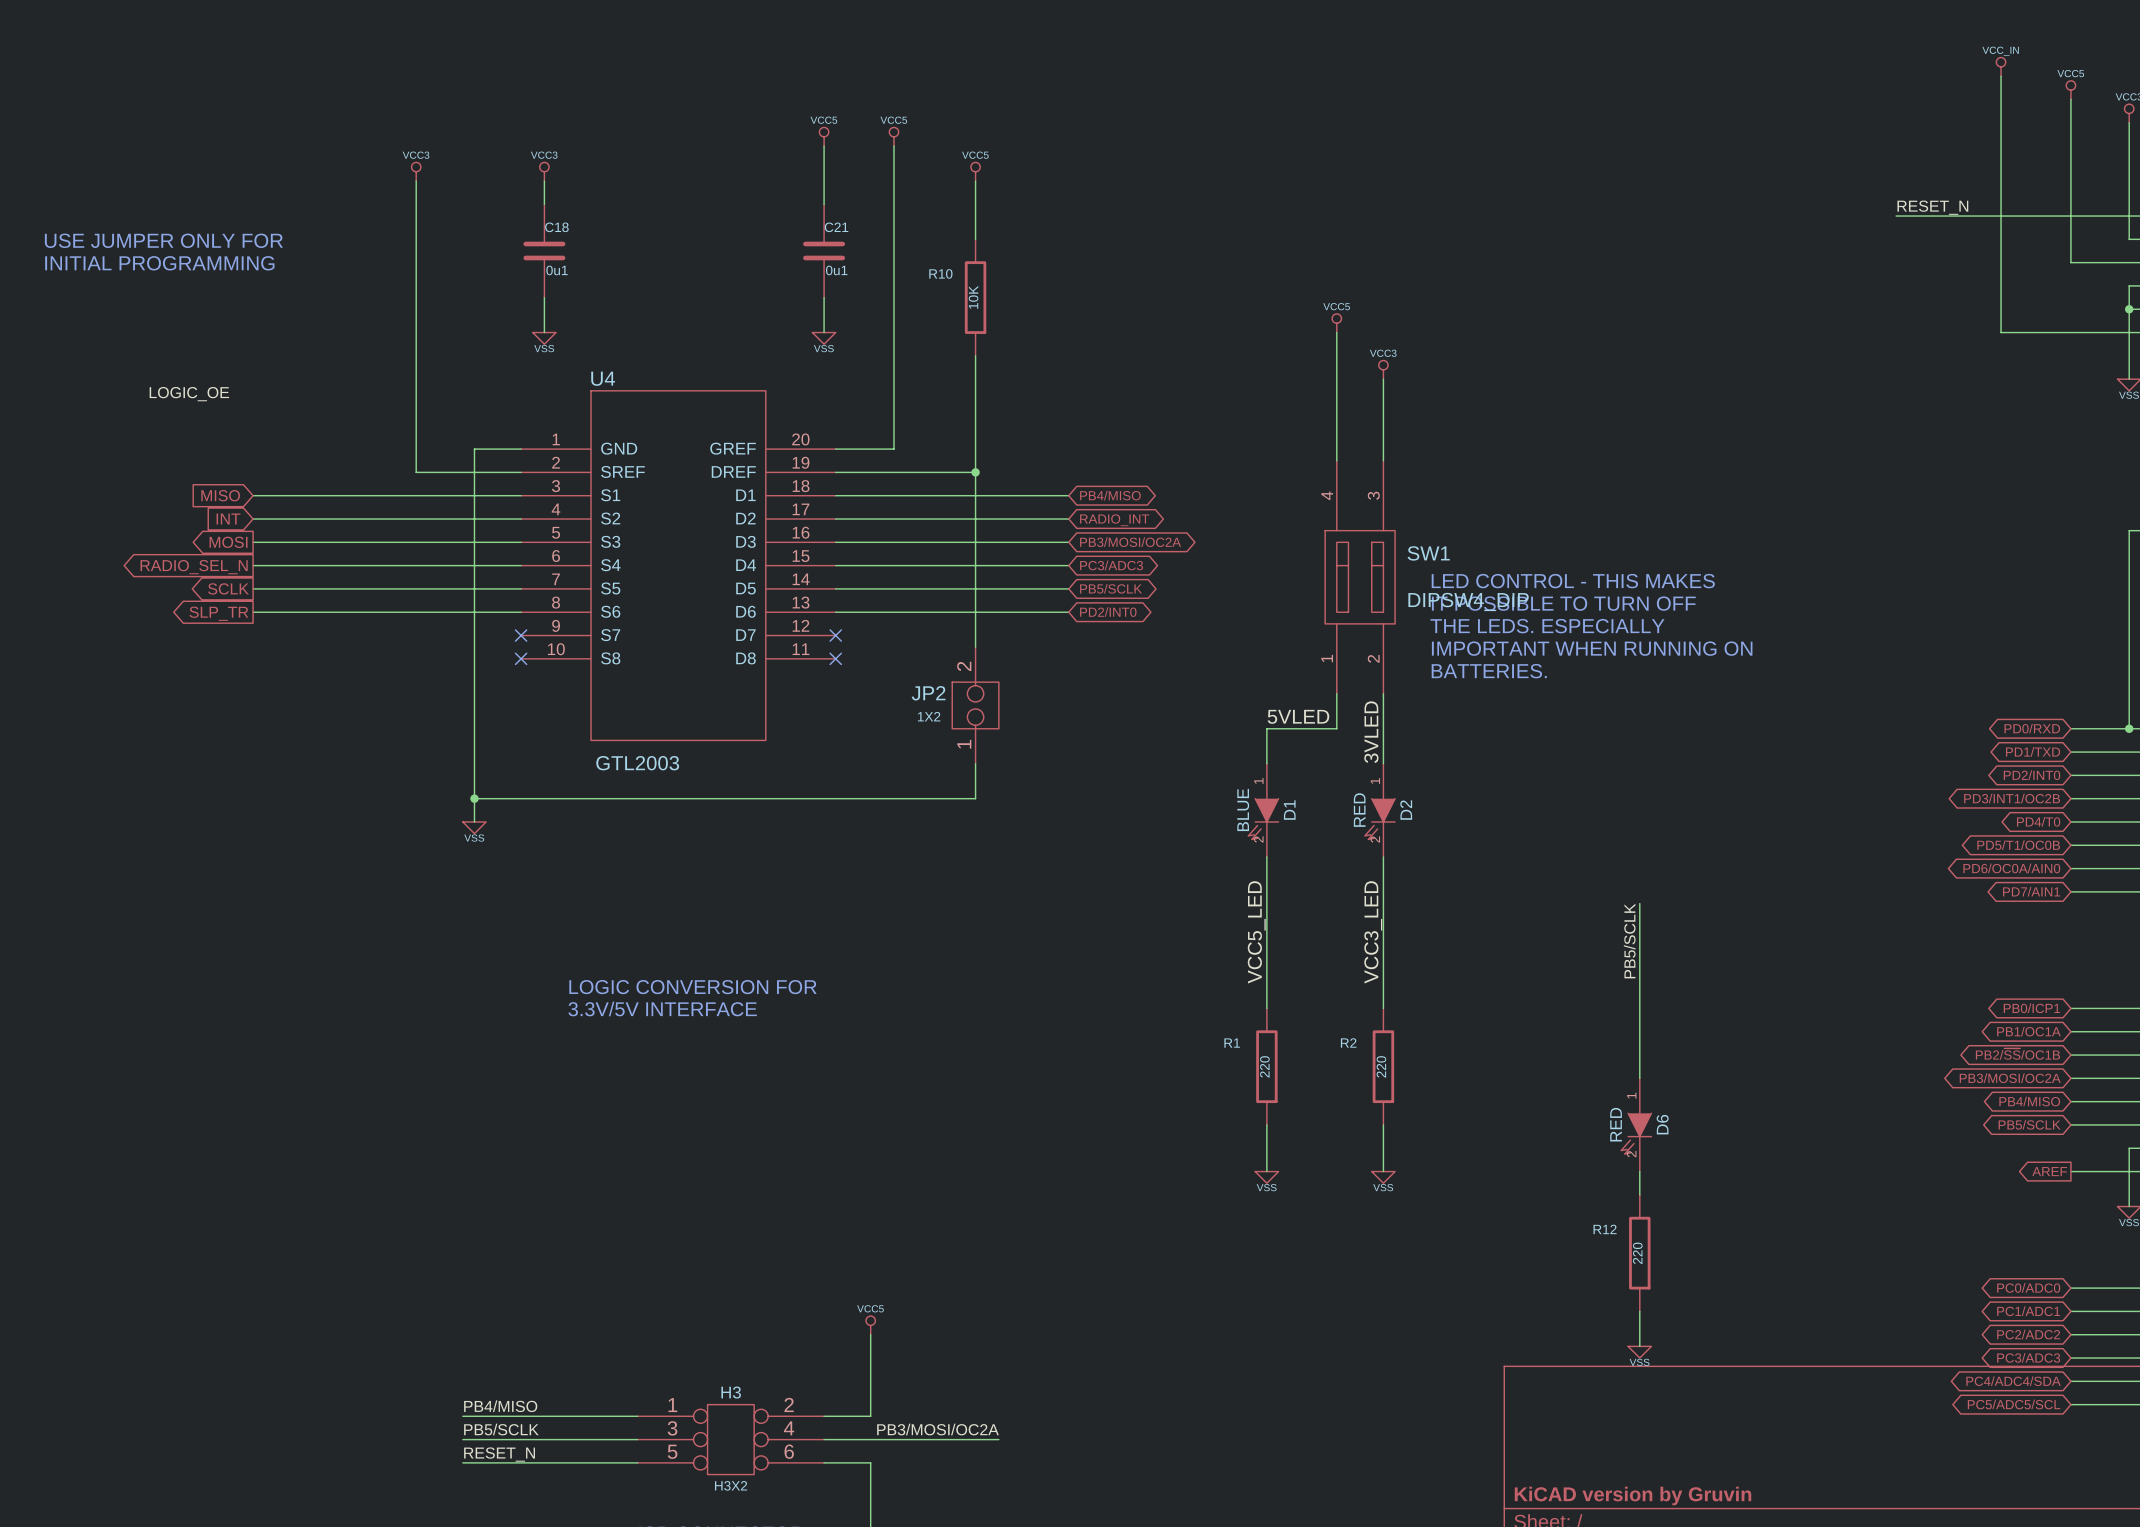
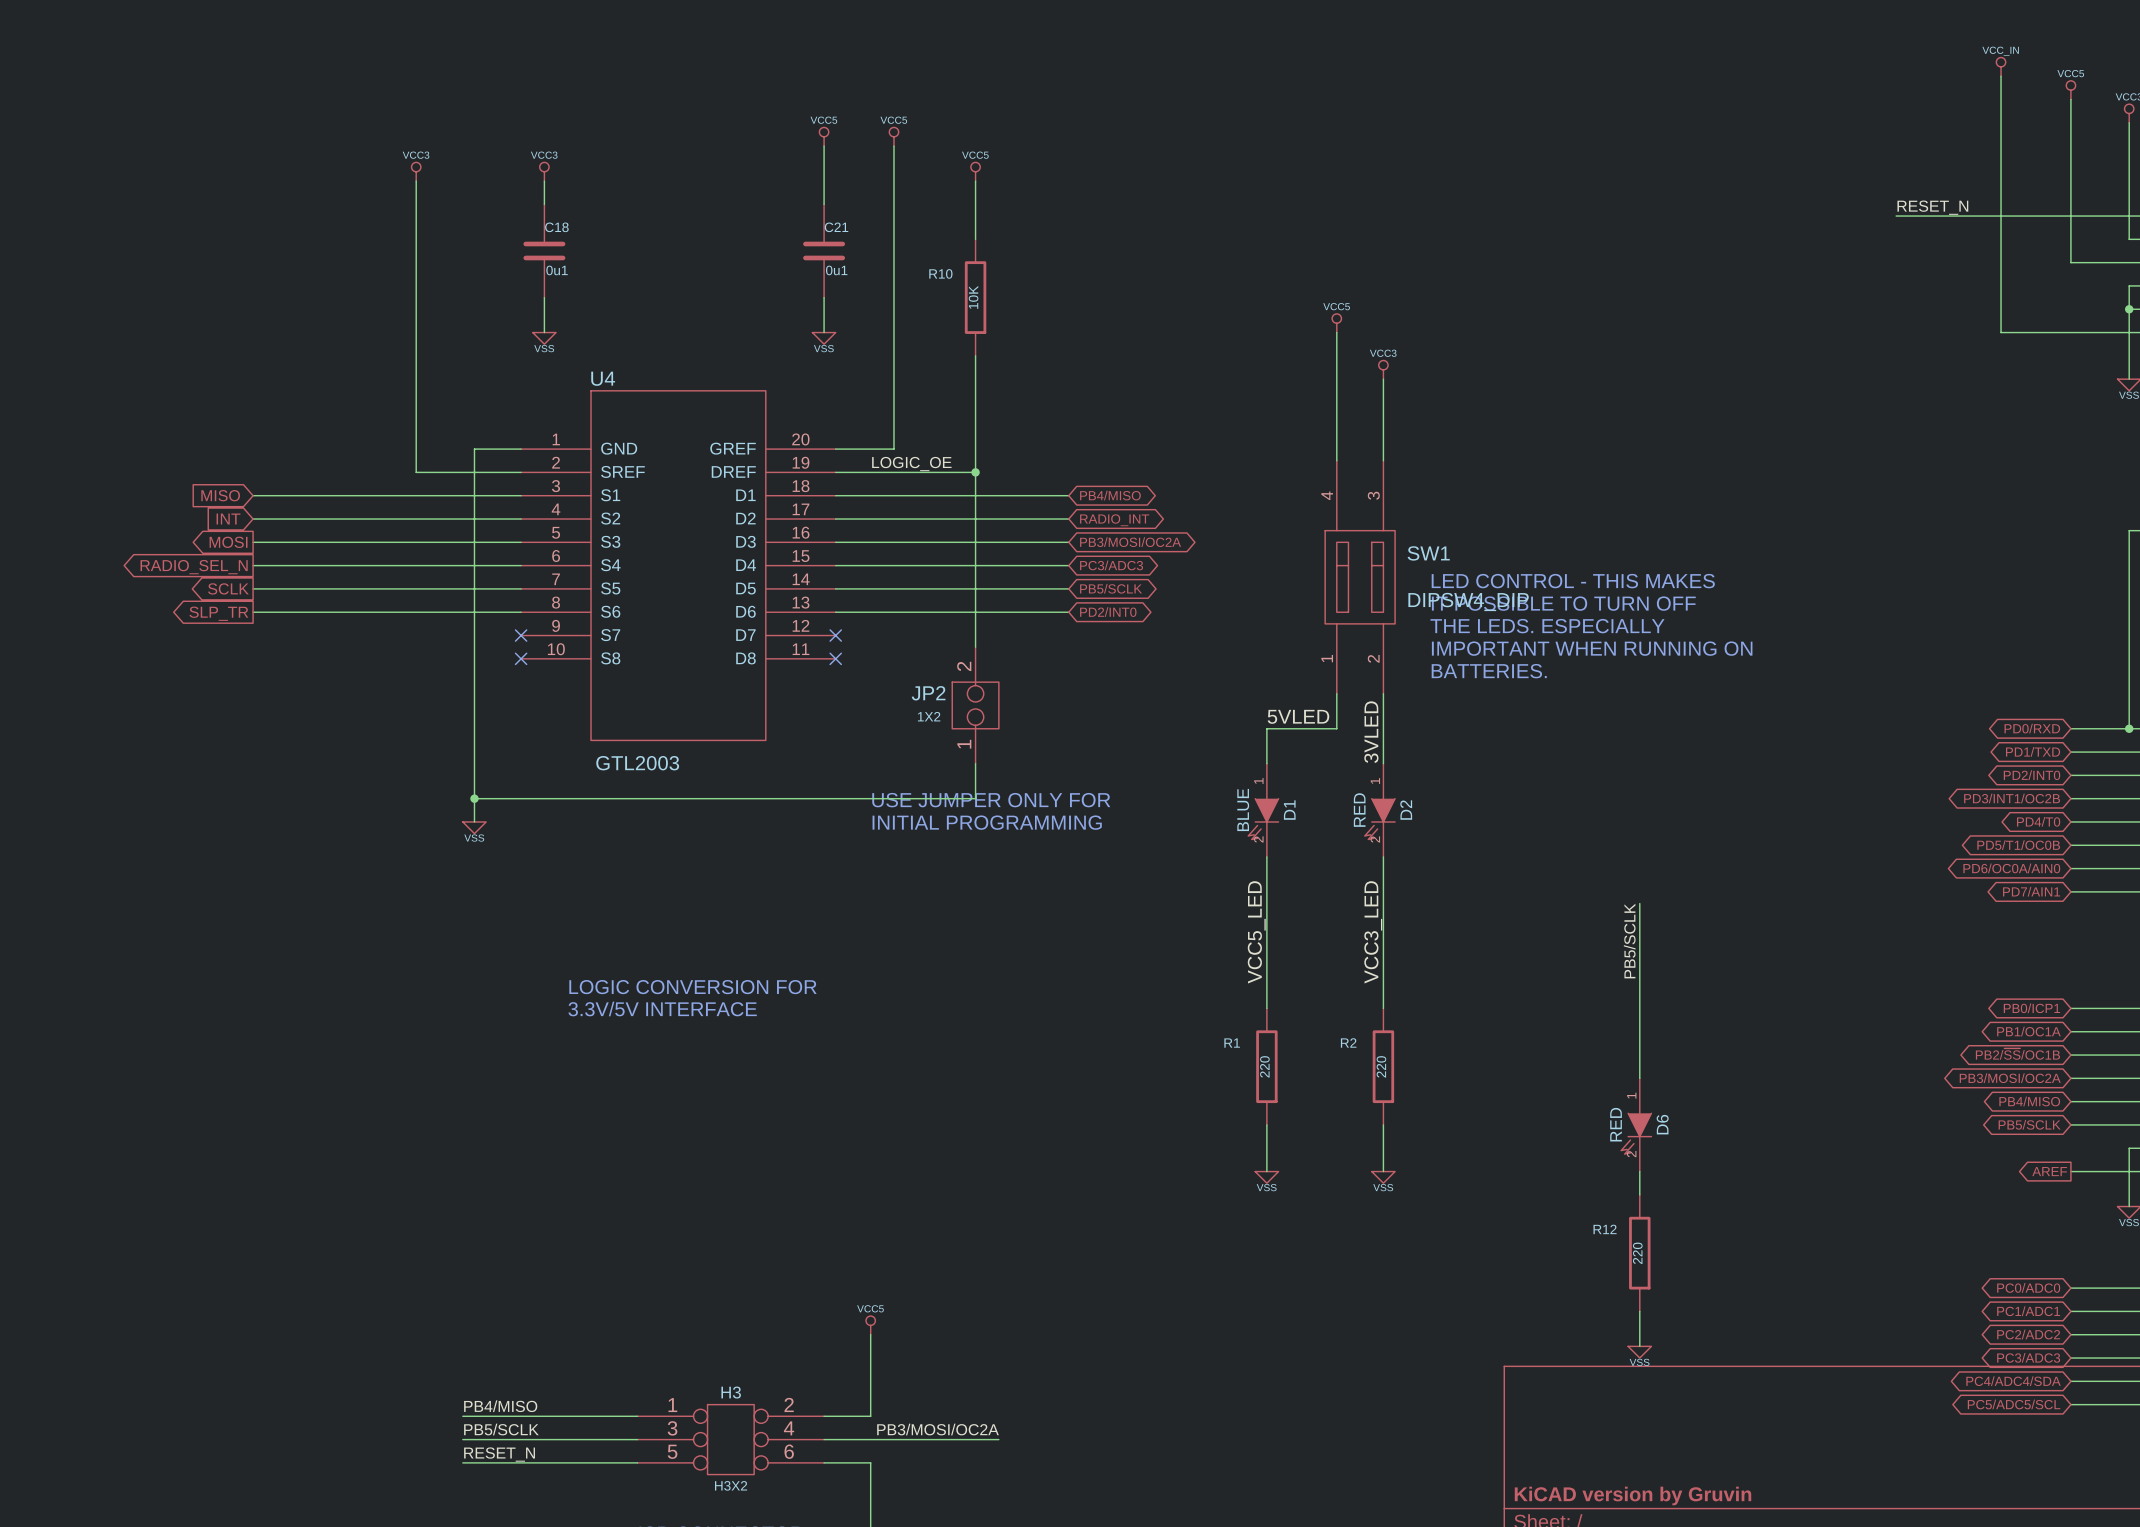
text: USE JUMPER ONLY FOR (163, 240) -> none
text: INITIAL PROGRAMMING (159, 263) -> none
label: LOGIC_OE (189, 394) -> none
label: none -> LOGIC_OE (911, 464)
text: none -> USE JUMPER ONLY FOR (991, 800)
text: none -> INITIAL PROGRAMMING (987, 822)

